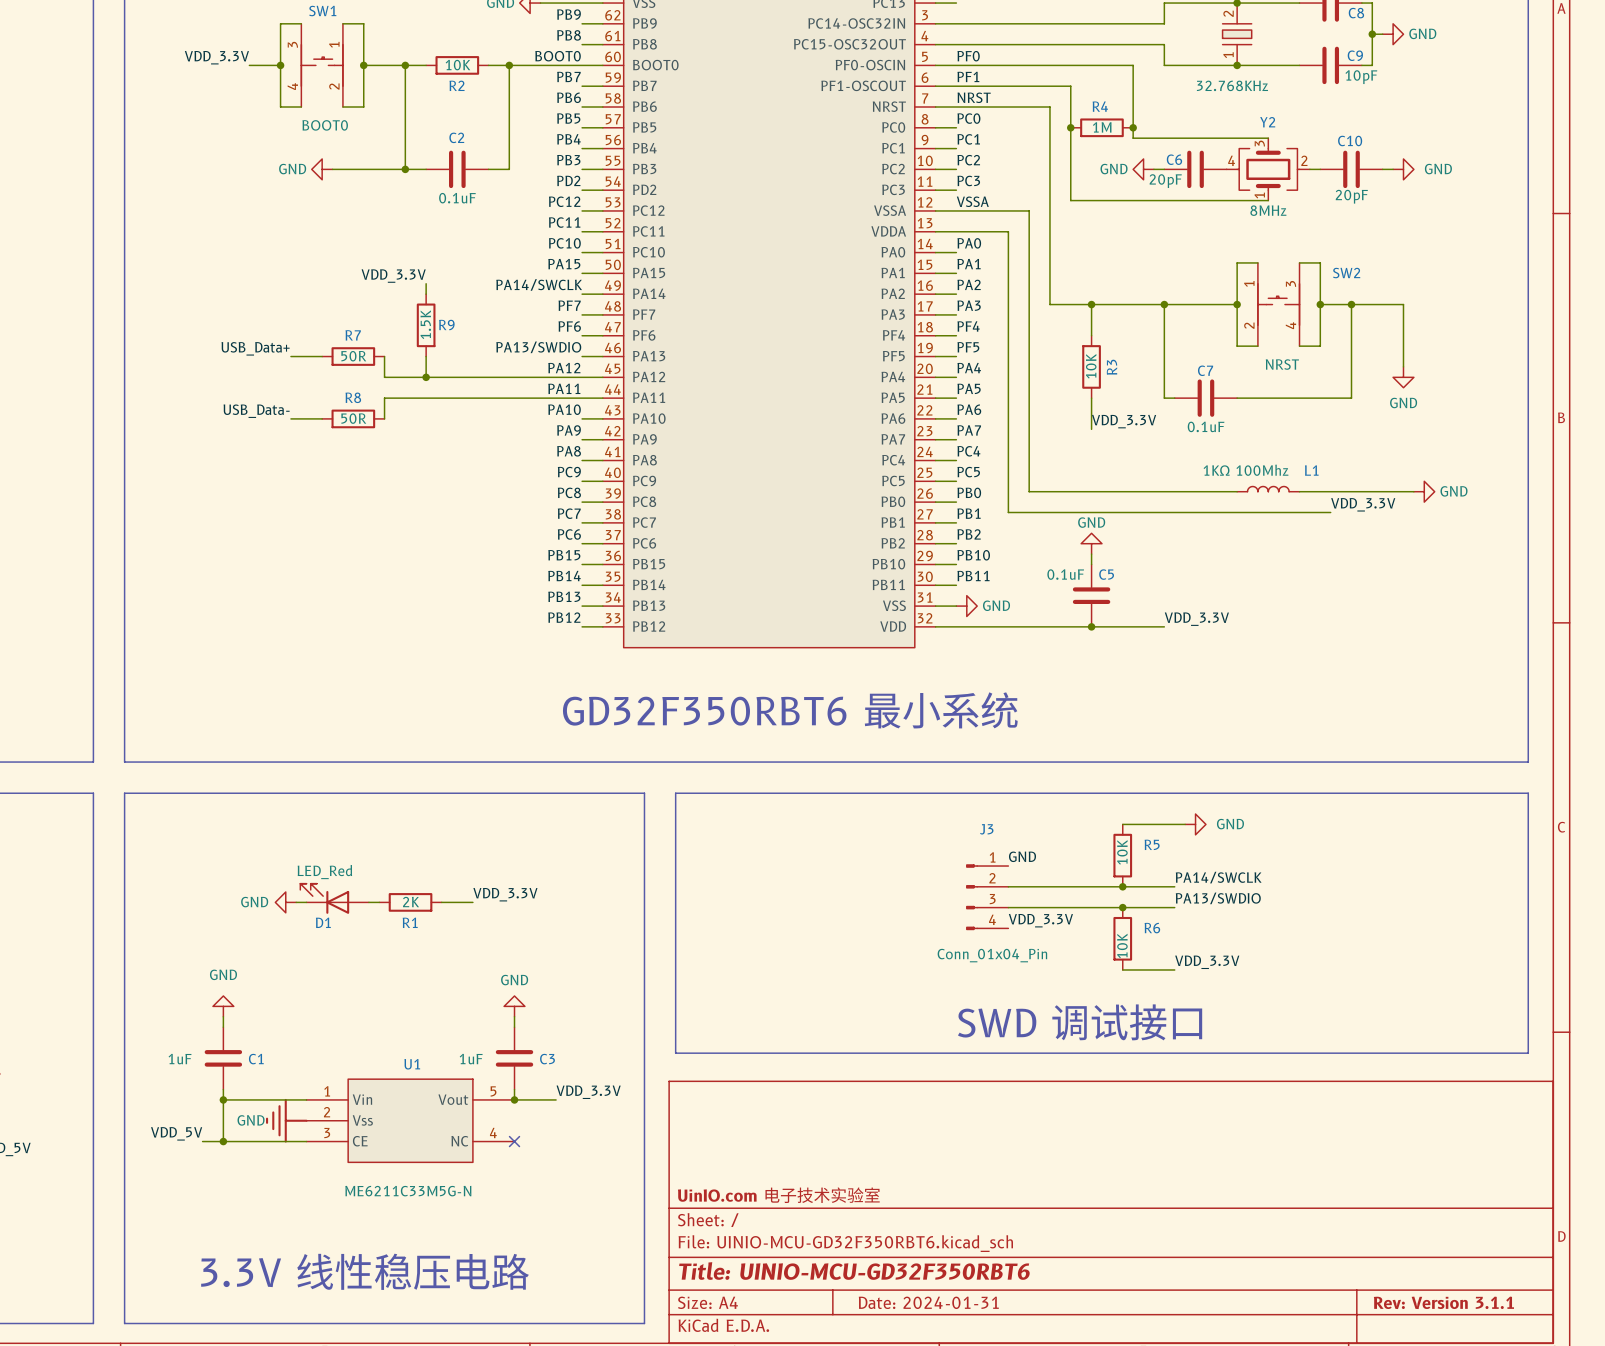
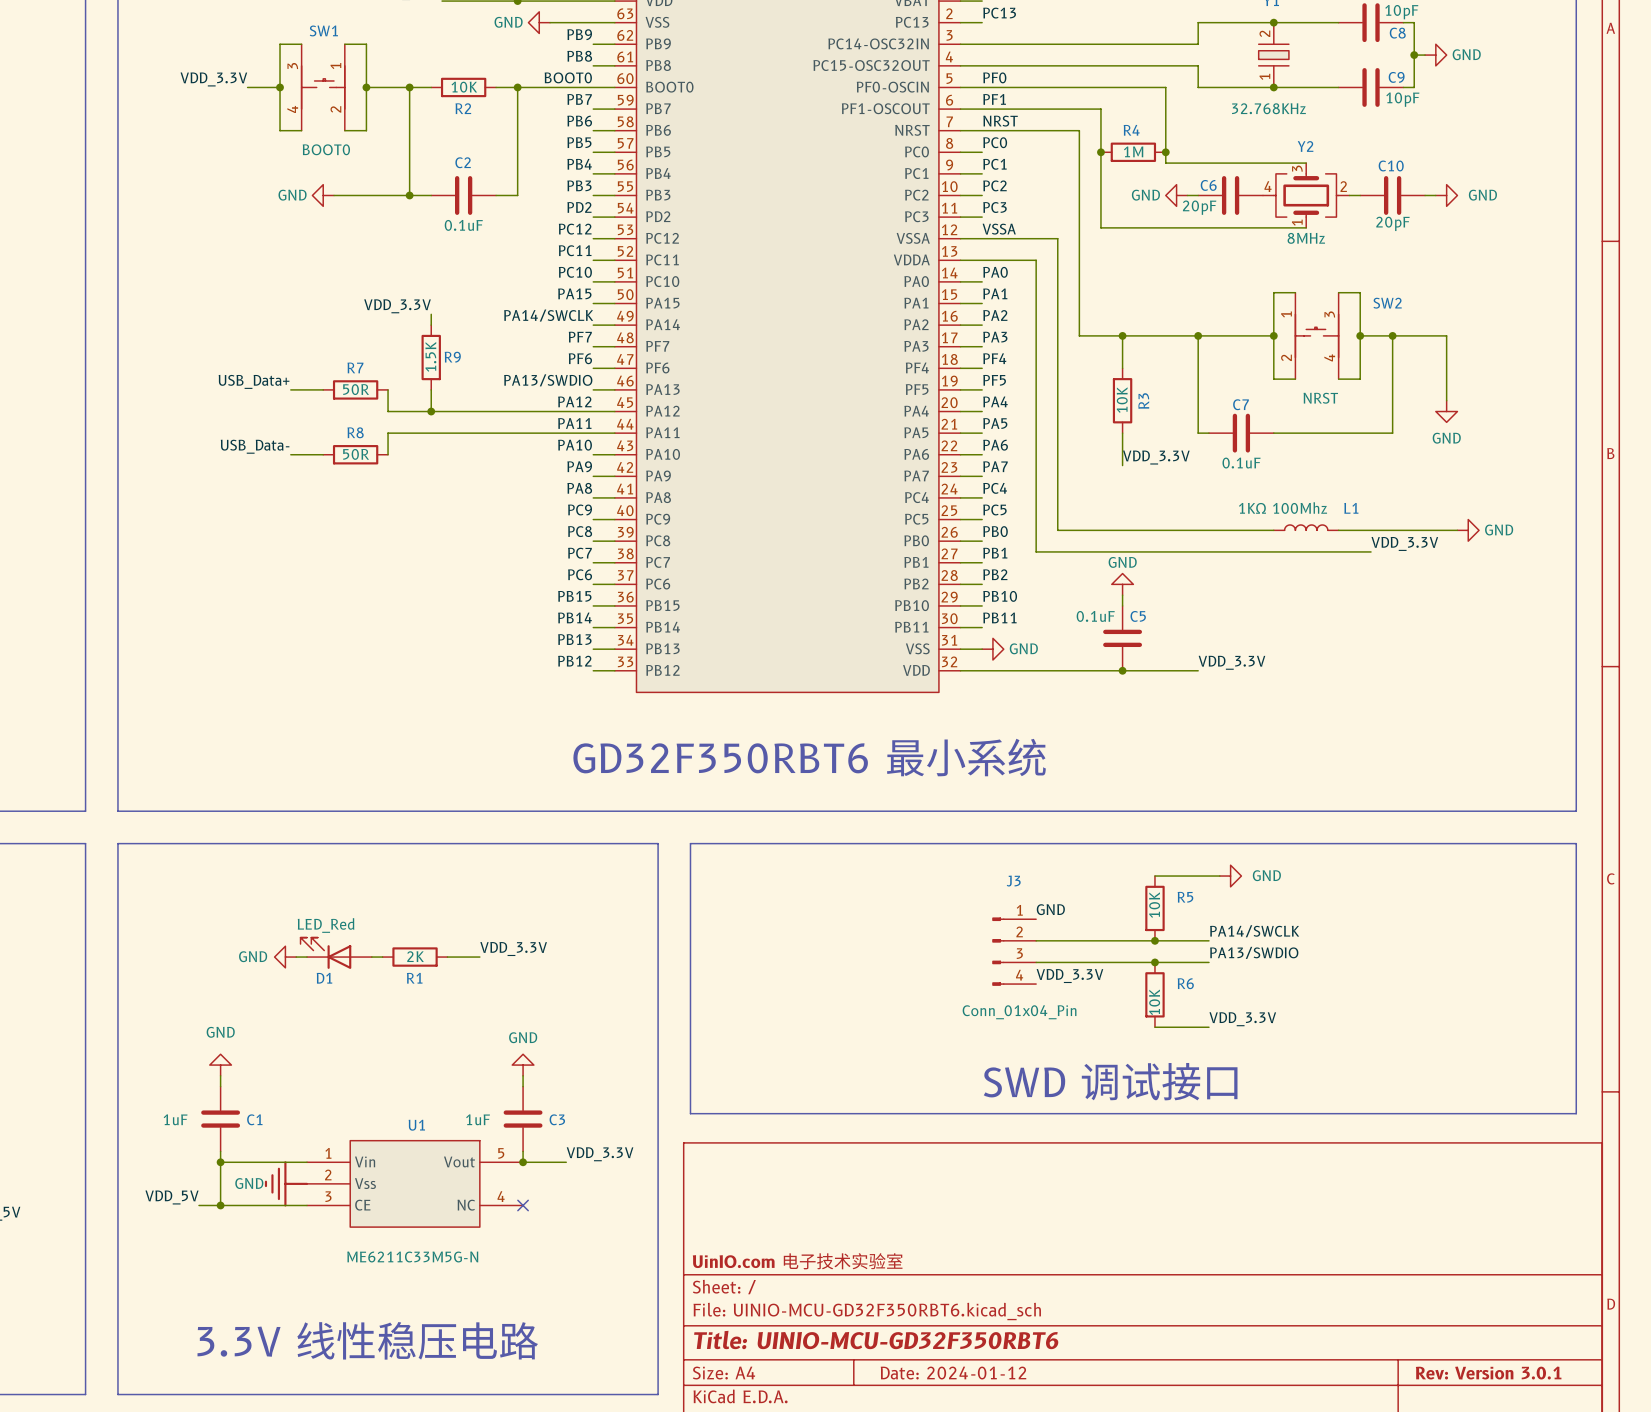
title block: Date: 2024-01-31 (928, 1302) -> Date: 2024-01-12 (953, 1373)
title block: Rev: Version 3.1.1 (1443, 1302) -> Rev: Version 3.0.1 (1488, 1373)

